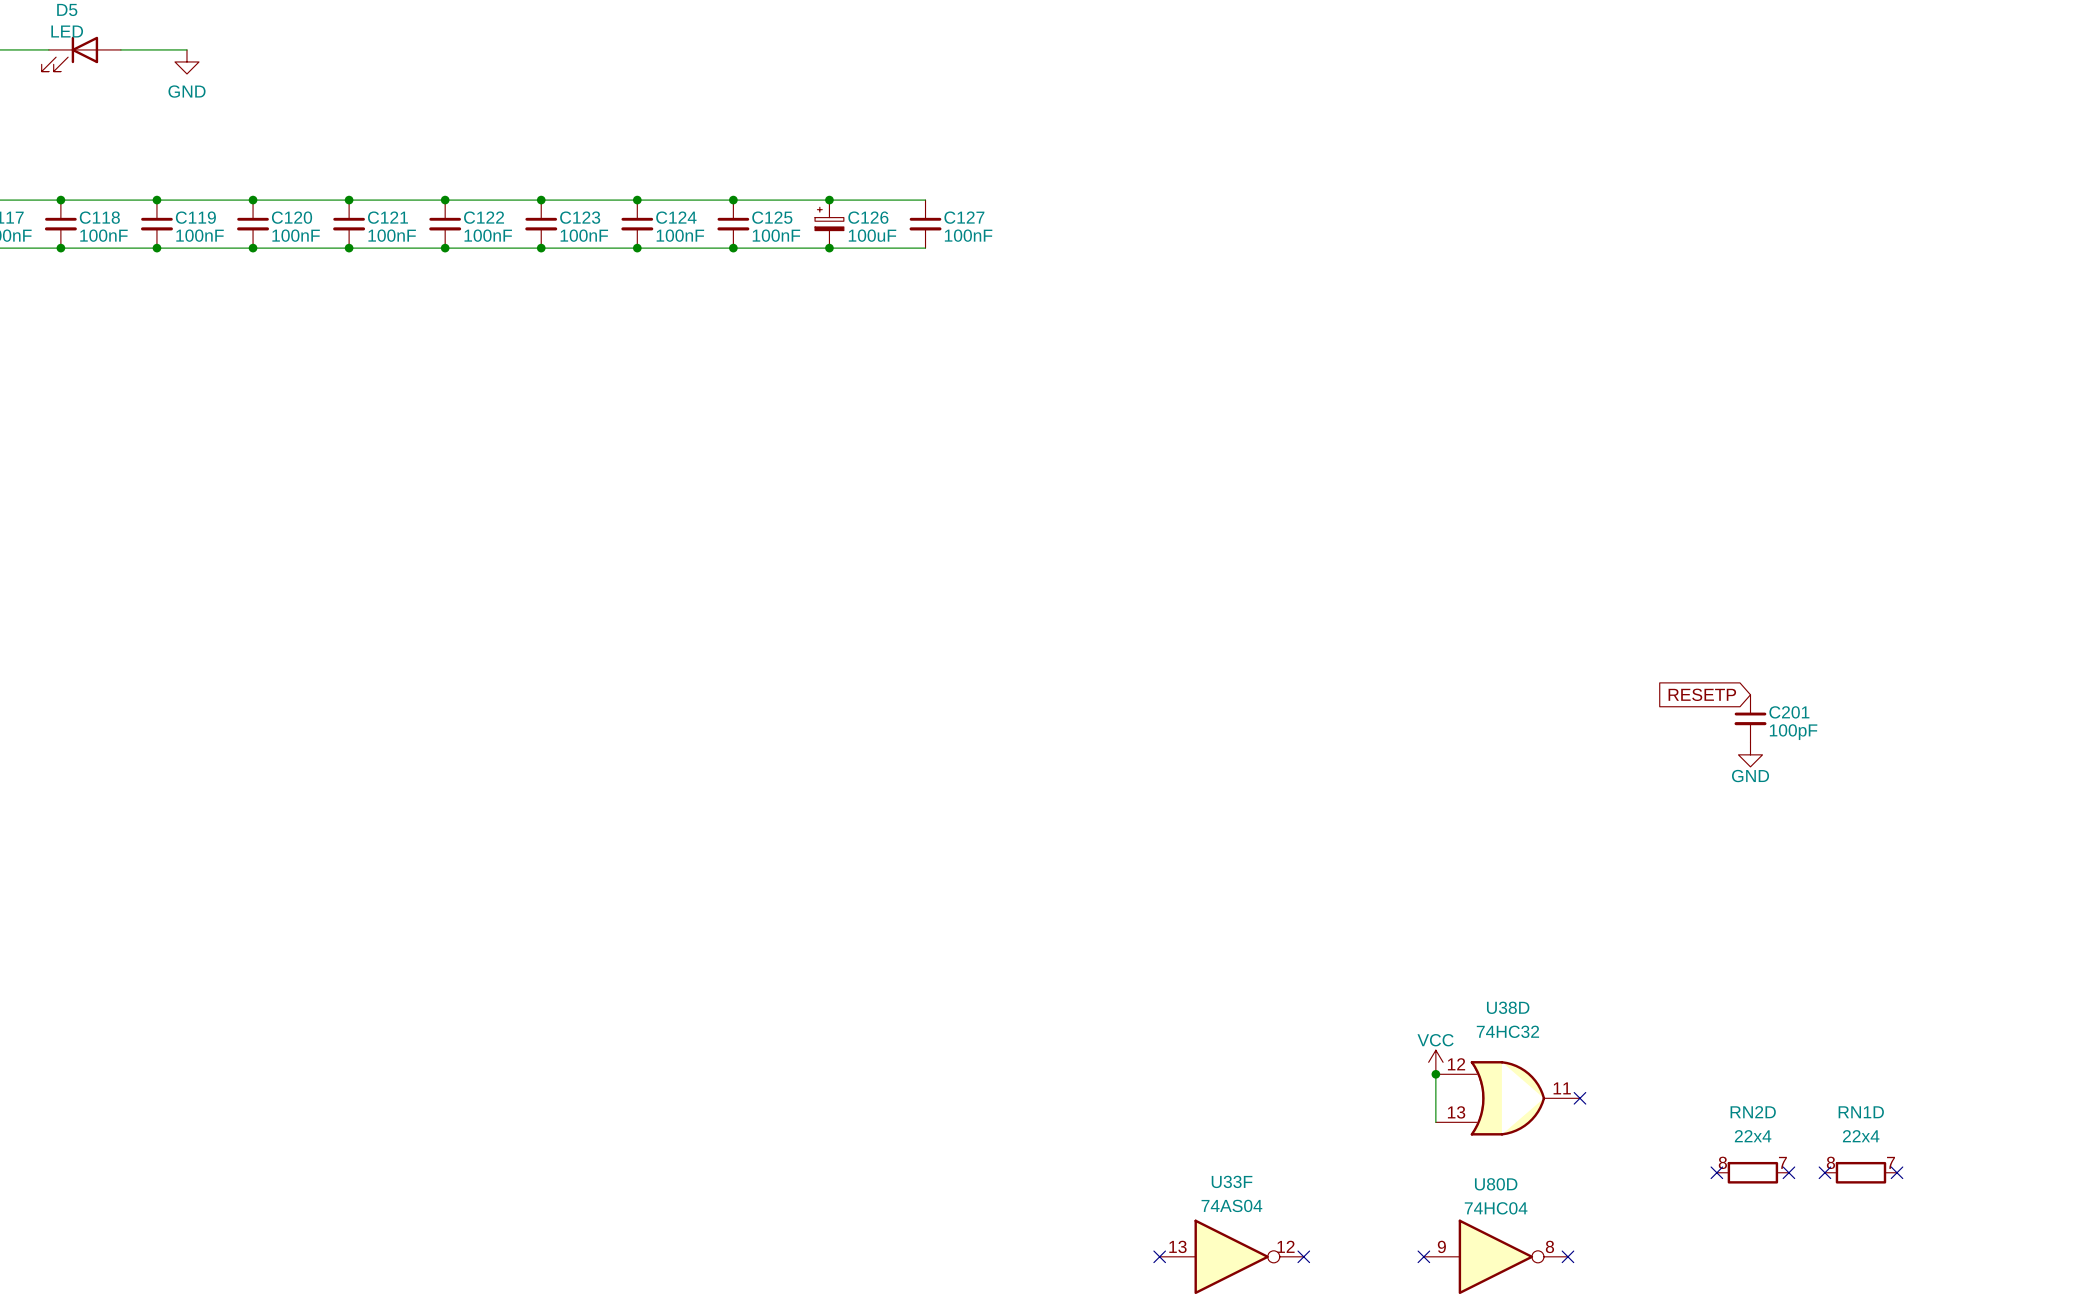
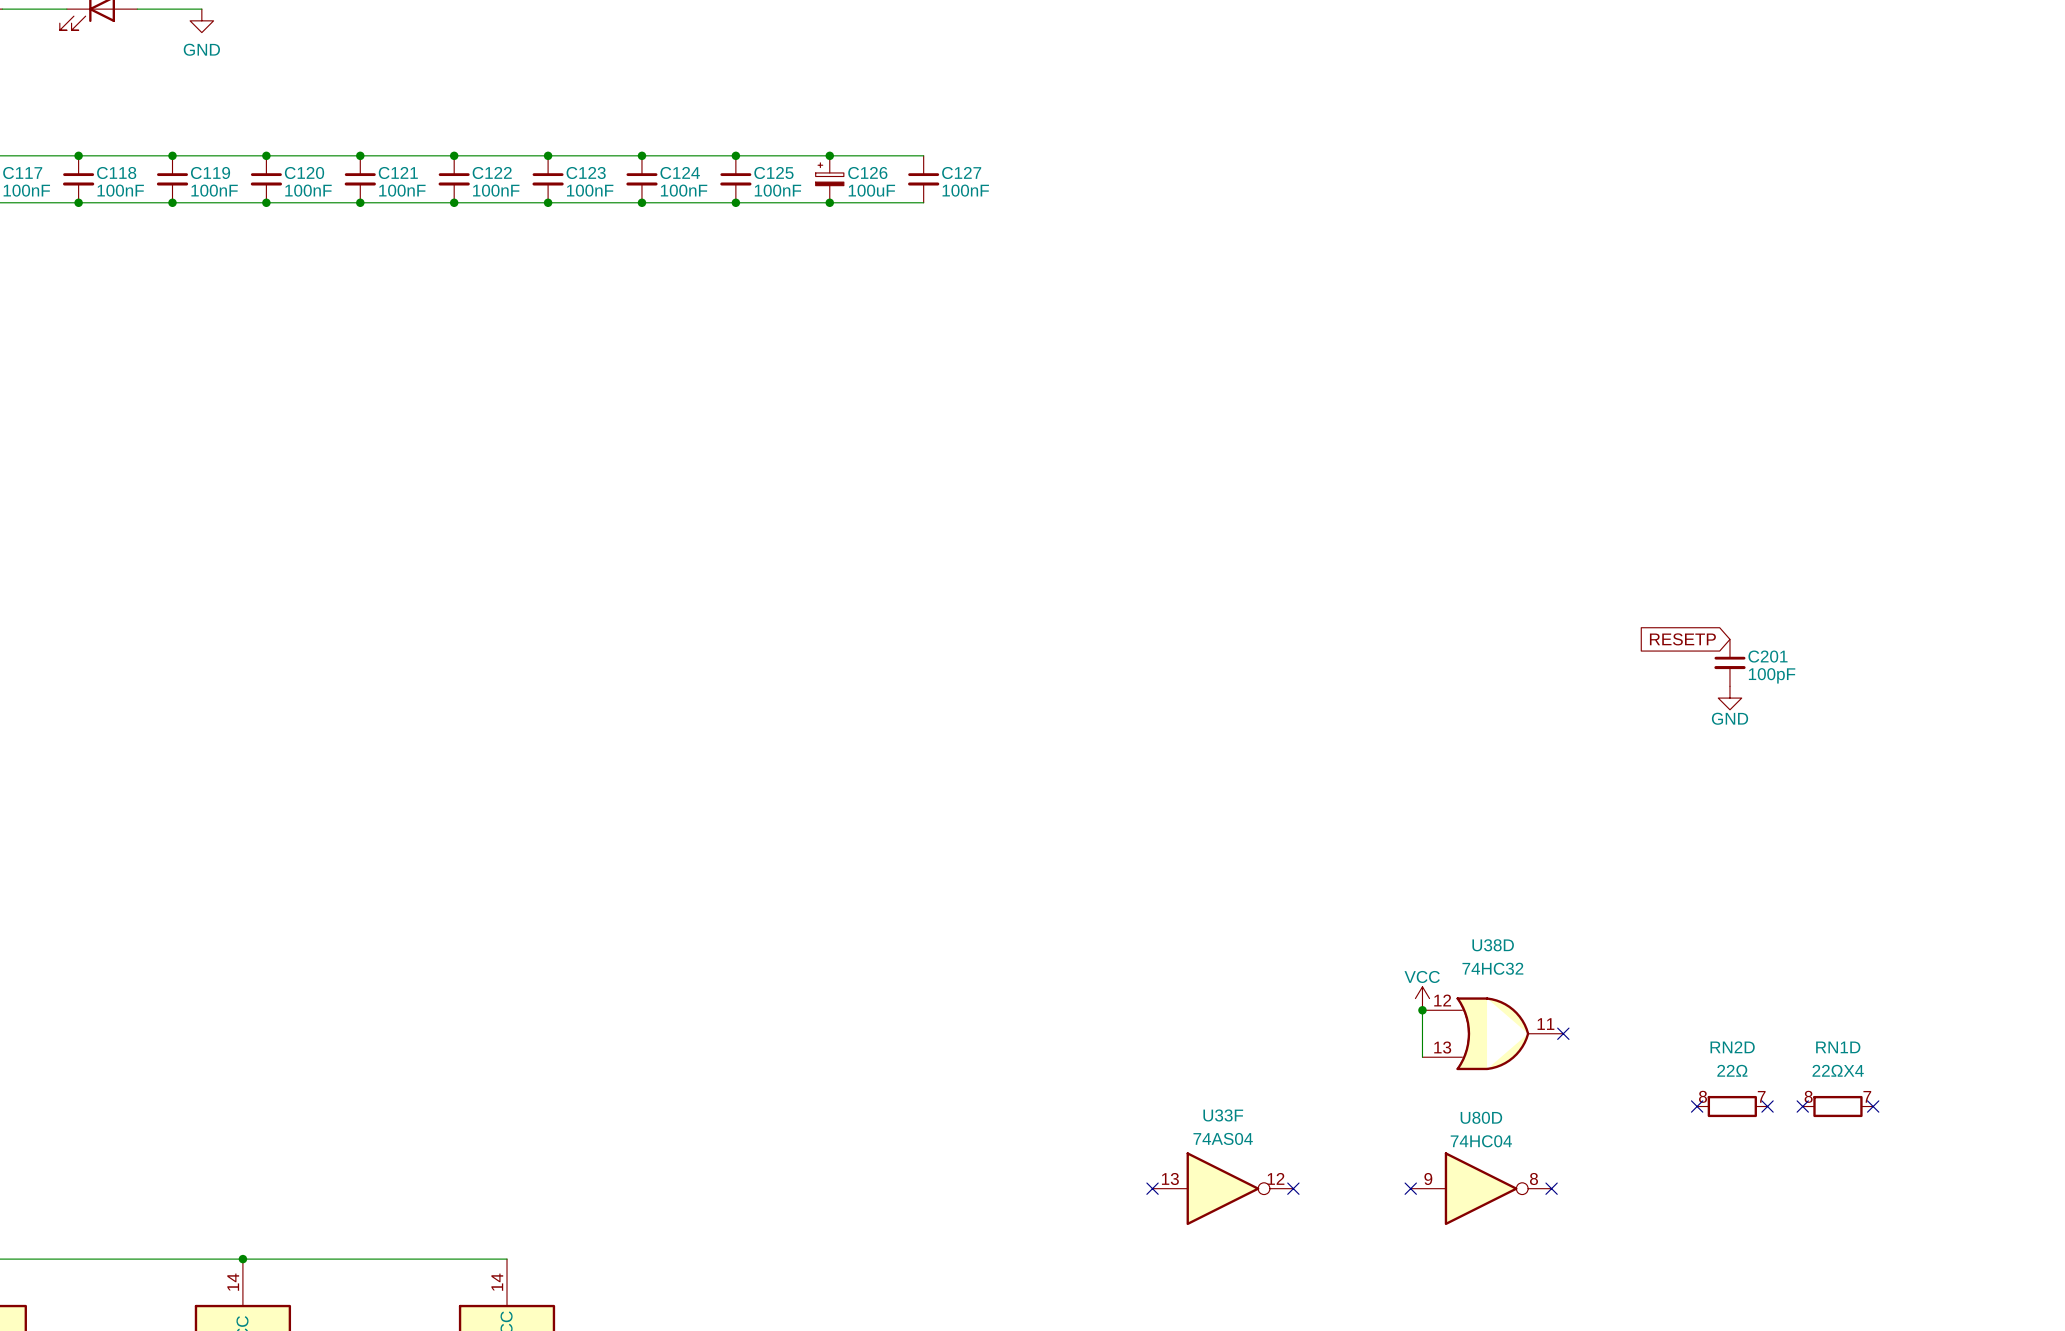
RN2D value: 22x4 (1753, 1136) -> 22Ω (1732, 1070)
RN1D value: 22x4 (1861, 1136) -> 22ΩX4 (1838, 1070)

